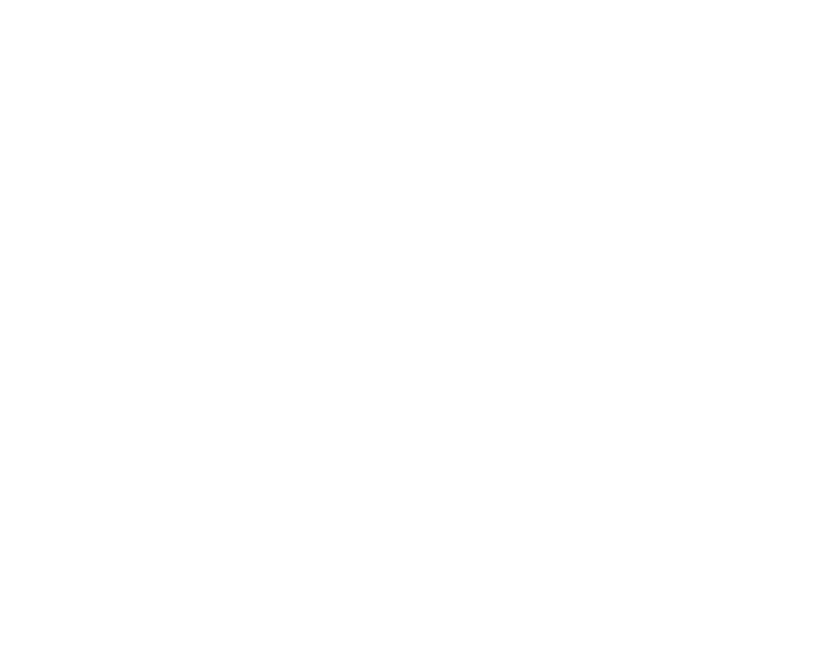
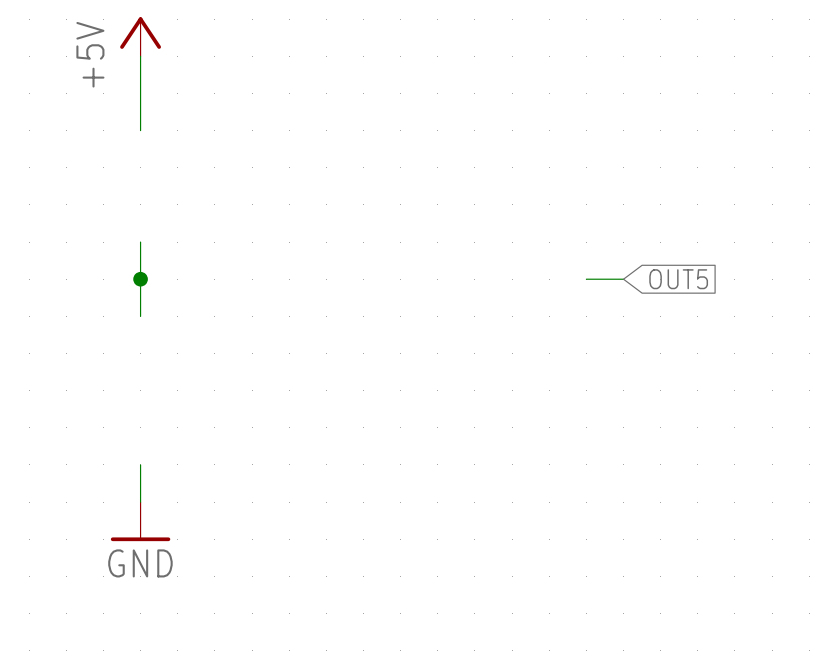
power symbol: none -> +5V (140, 36)
wire: none -> (140, 56) (140, 130)
wire: none -> (140, 242) (140, 316)
junction: none -> (140, 279)
wire: none -> (586, 279) (623, 279)
global label: none -> OUT5 (678, 279)
wire: none -> (140, 464) (140, 502)
power symbol: none -> GND (140, 521)

